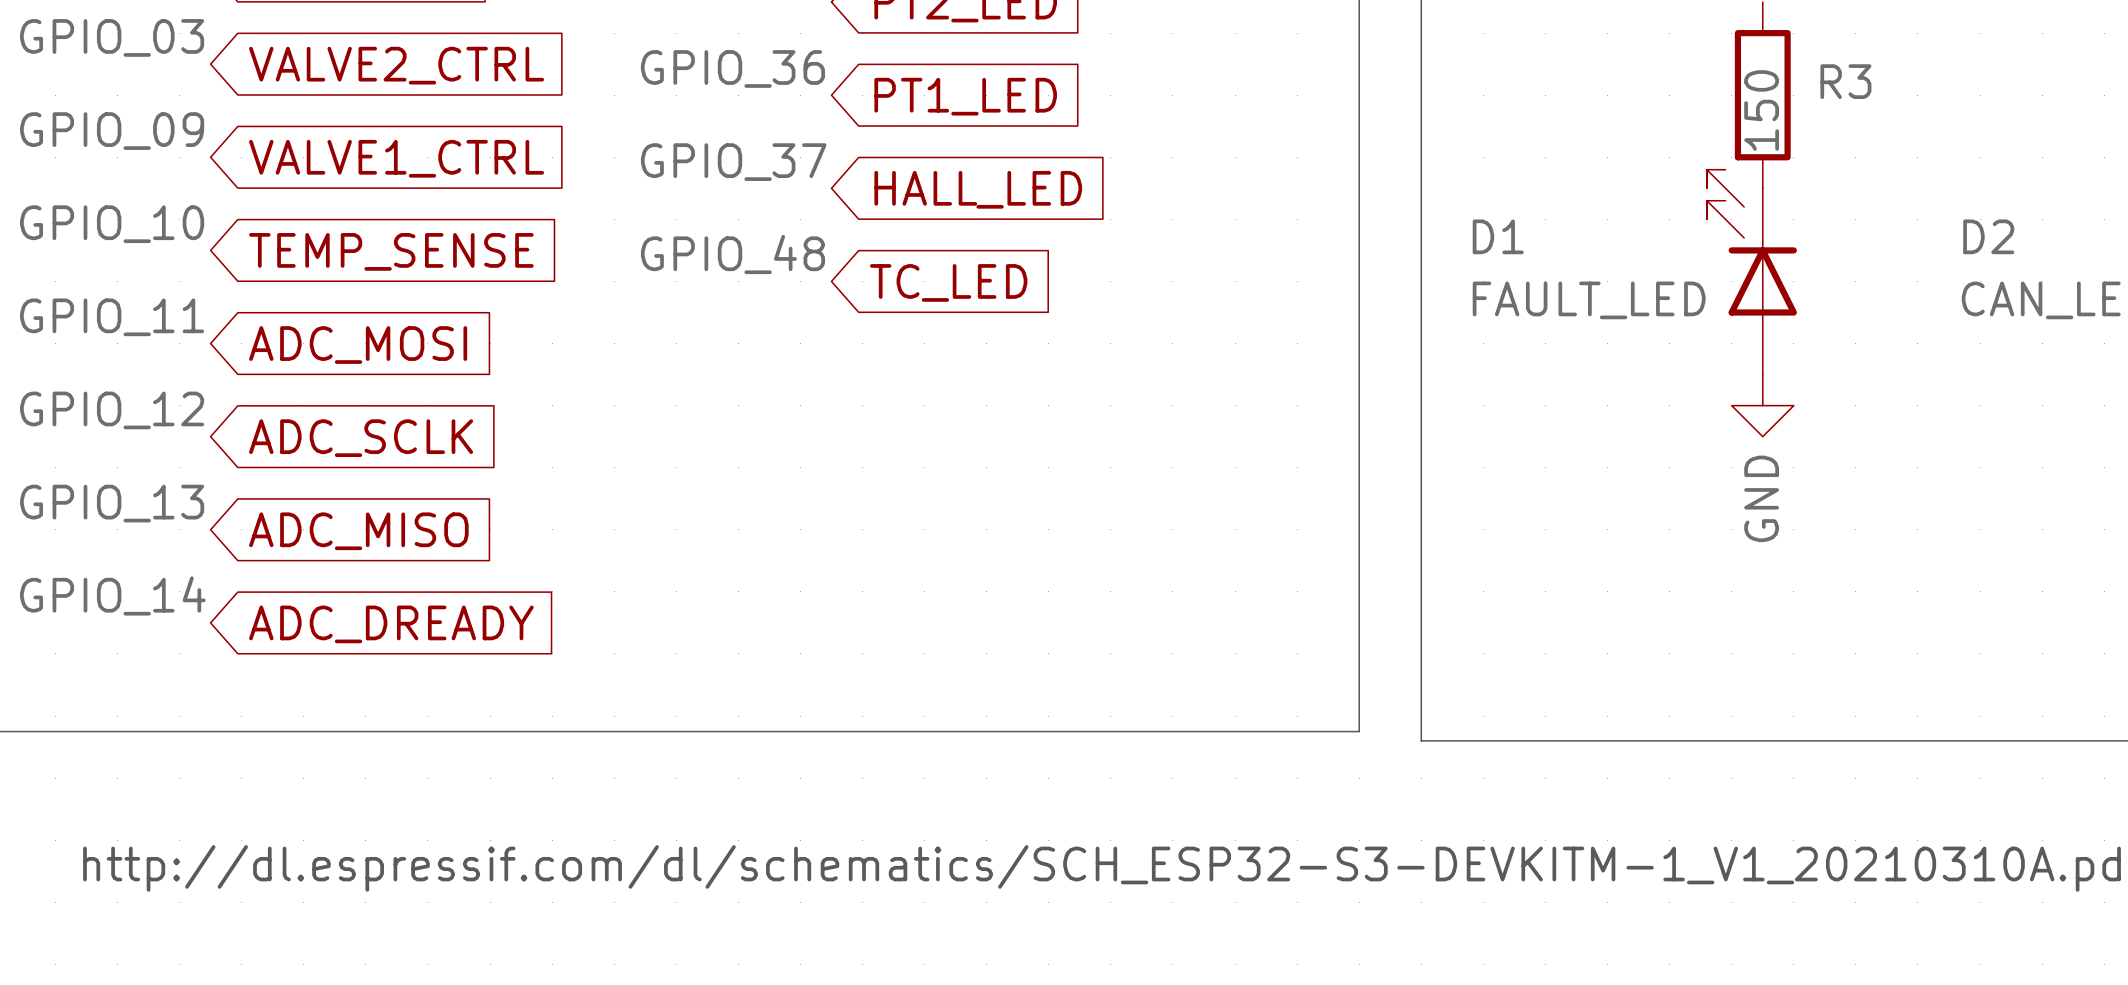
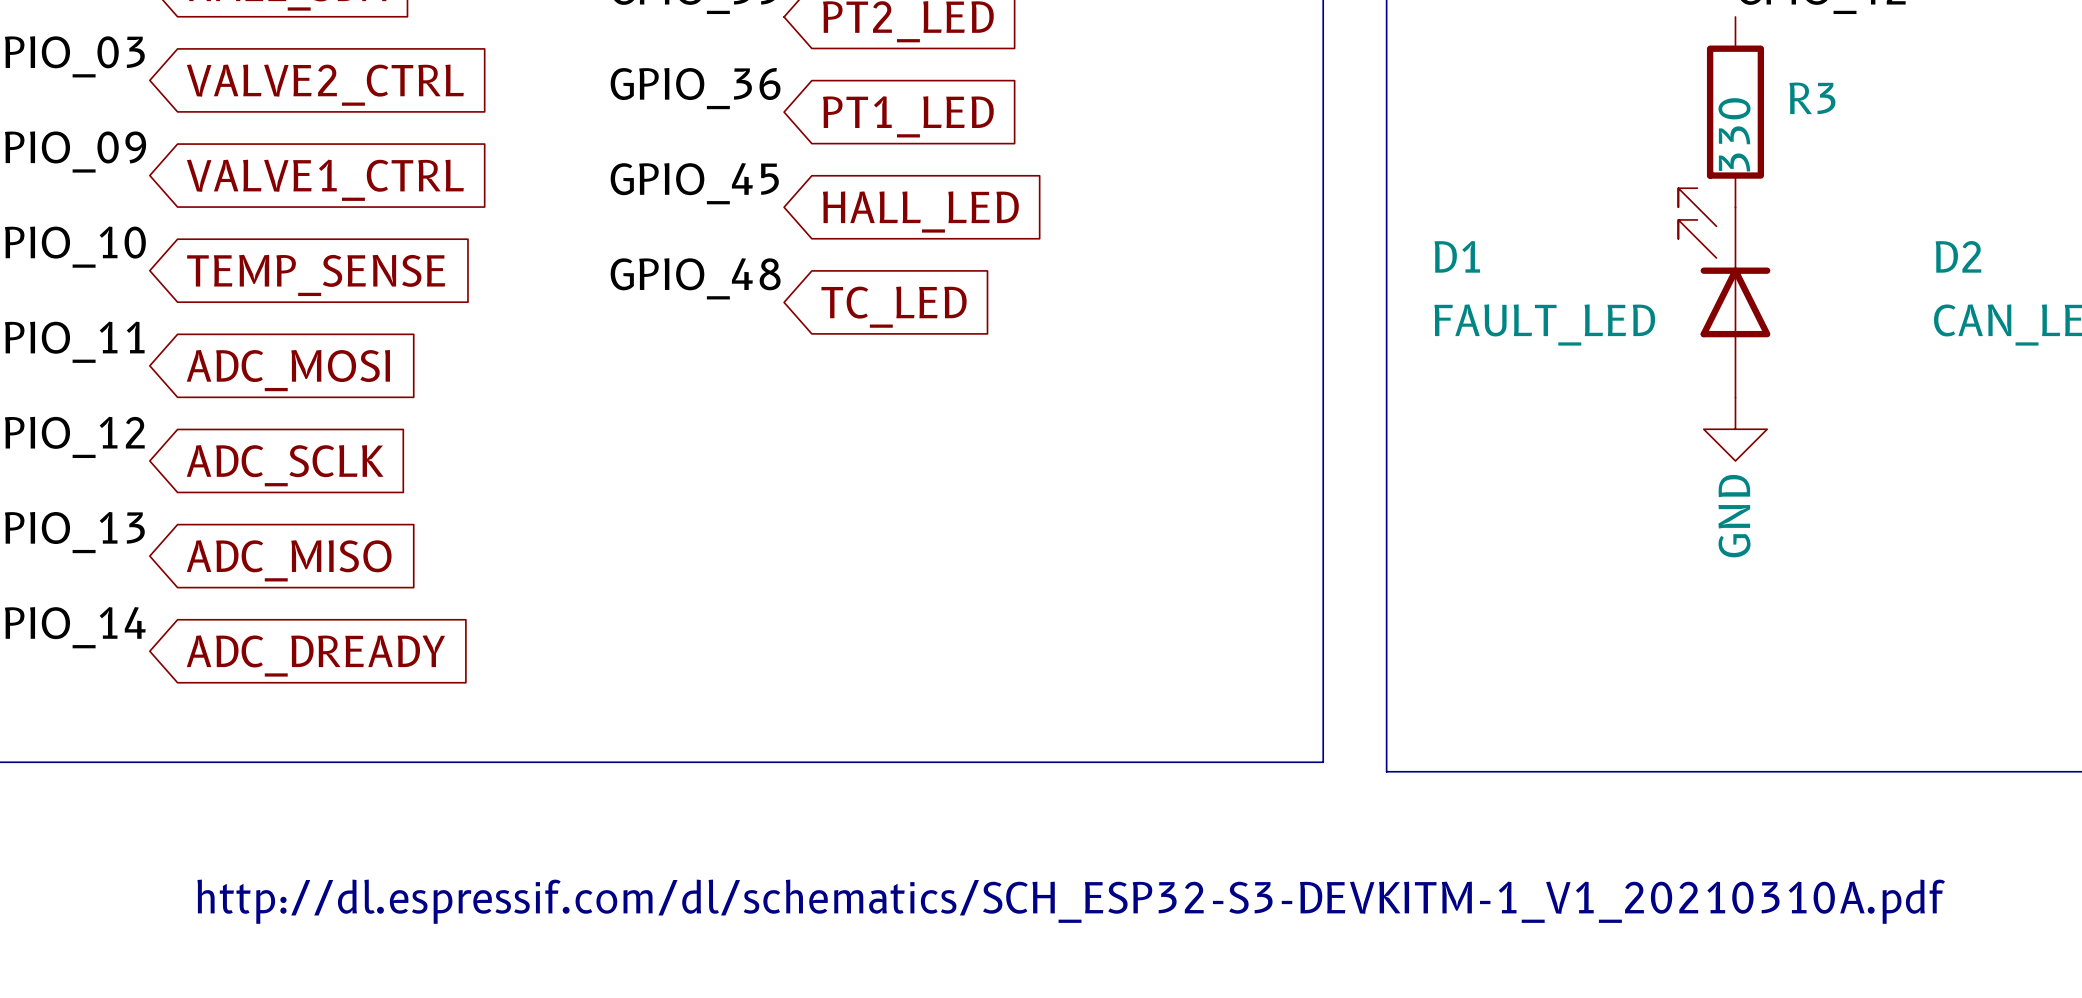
R3 value: 150 (1761, 110) -> 330 (1734, 134)
label: GPIO_37 (733, 162) -> GPIO_45 (694, 183)

